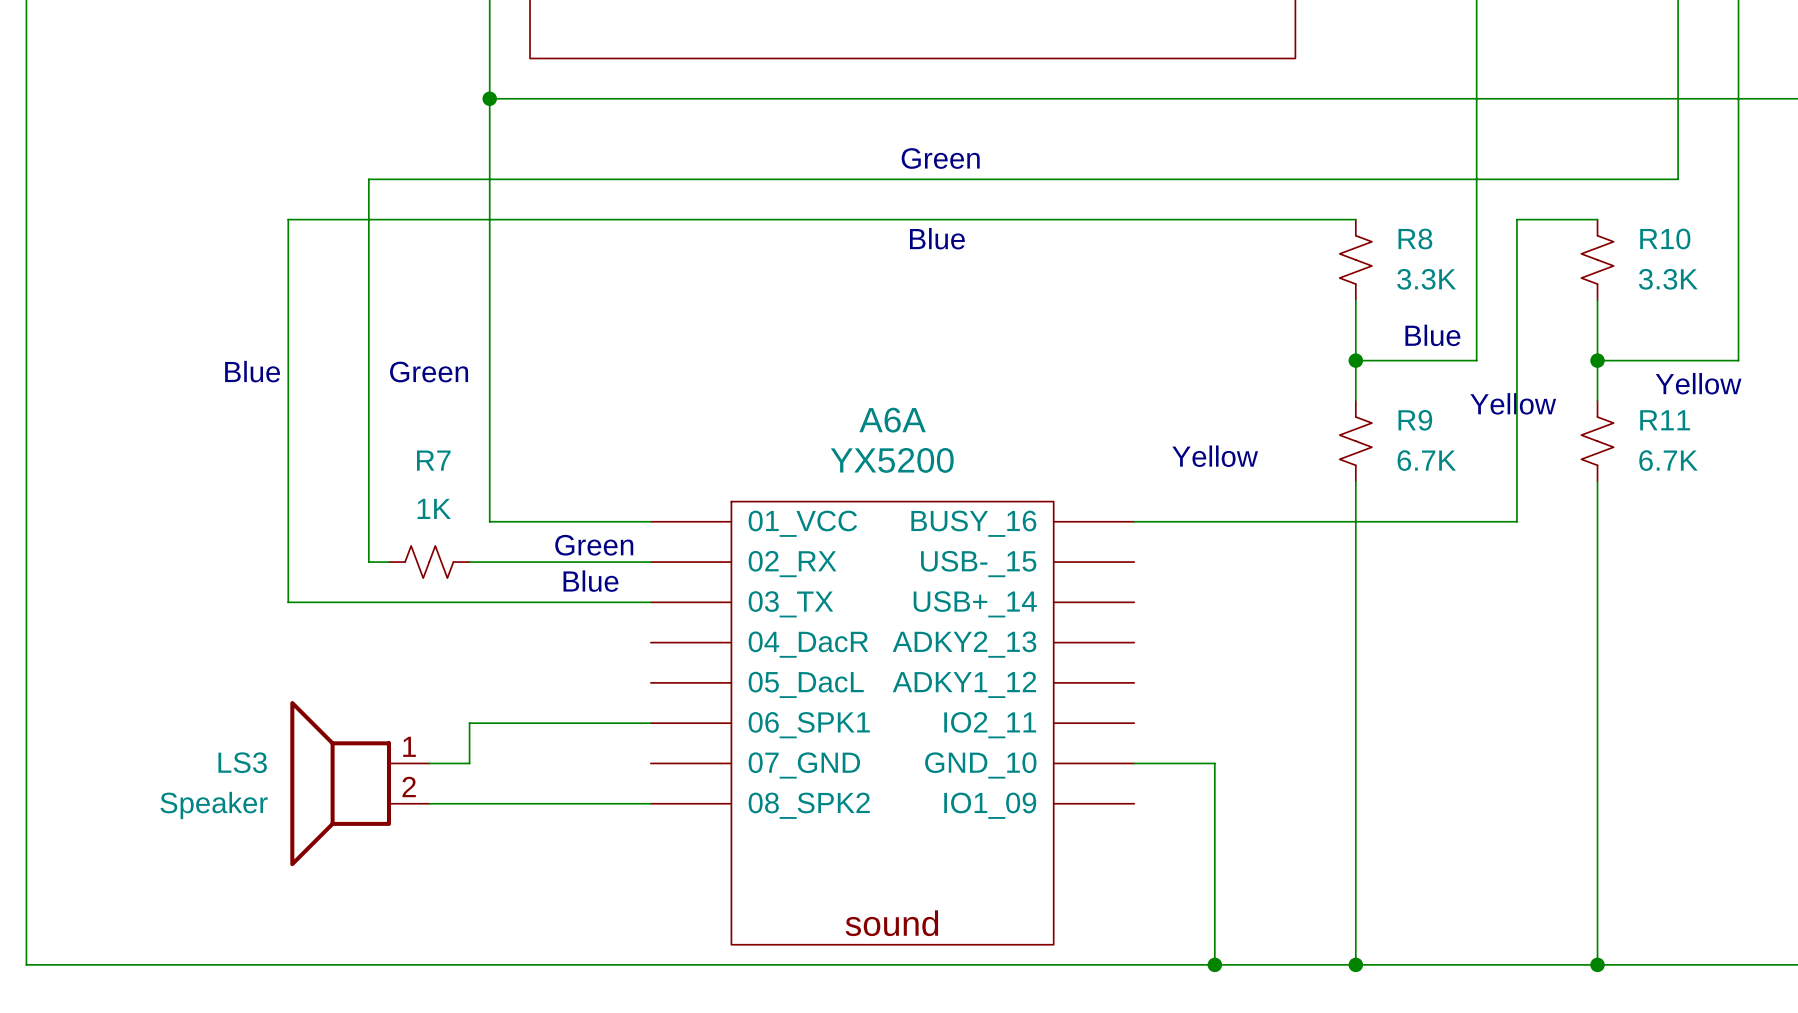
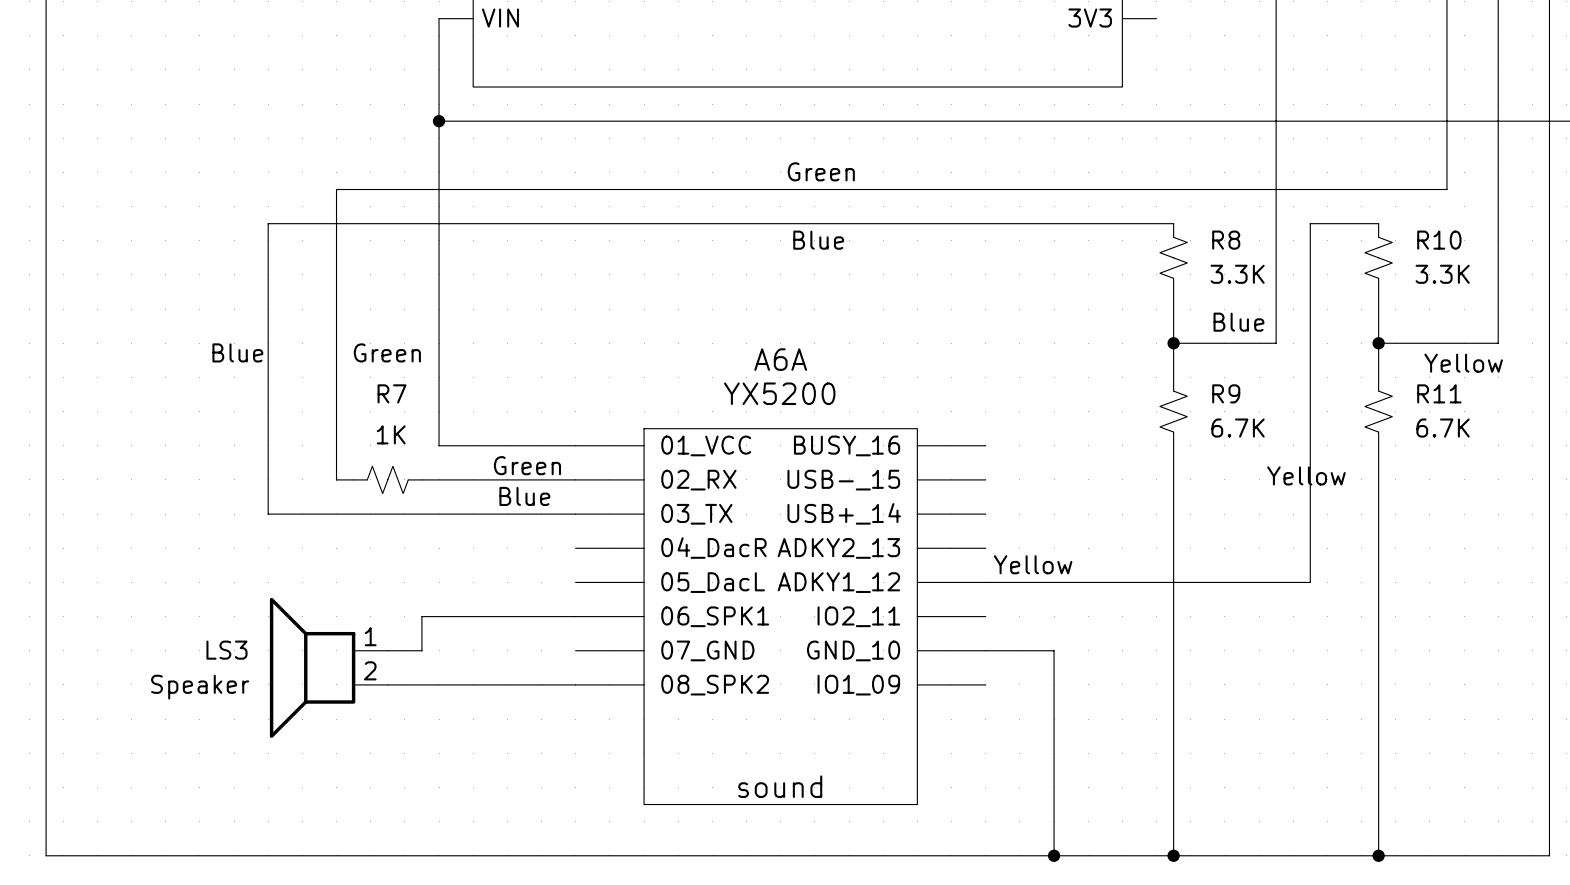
text position: Yellow (1513, 403) -> Yellow (1306, 475)
text: Yellow (1215, 456) -> none
wire: (489, 481) (489, 521) -> (421, 479) (439, 479)
wire: none -> (439, 445) (575, 445)
wire: (368, 521) (368, 562) -> (336, 479) (353, 479)
wire: (1134, 521) (1516, 521) -> (985, 582) (1310, 582) (1310, 479)
text position: Green (594, 545) -> Green (527, 465)
wire: (288, 562) (288, 602) (650, 602) -> (268, 514) (336, 514)
wire: none -> (353, 514) (421, 514)
R7 position: (429, 562) -> (387, 479)
text position: Blue (590, 581) -> Blue (524, 496)
text: none -> Yellow (1033, 564)
wire: none -> (575, 616) (421, 616) (421, 650) (387, 650)
wire: (650, 723) (469, 723) (469, 763) -> (575, 684) (421, 684)
A6A position: (892, 723) -> (780, 616)
wire: (1134, 763) (1214, 763) -> (985, 650) (1054, 650) (1054, 684)
LS3 position: (359, 783) -> (328, 667)
wire: (429, 803) (650, 803) -> none

